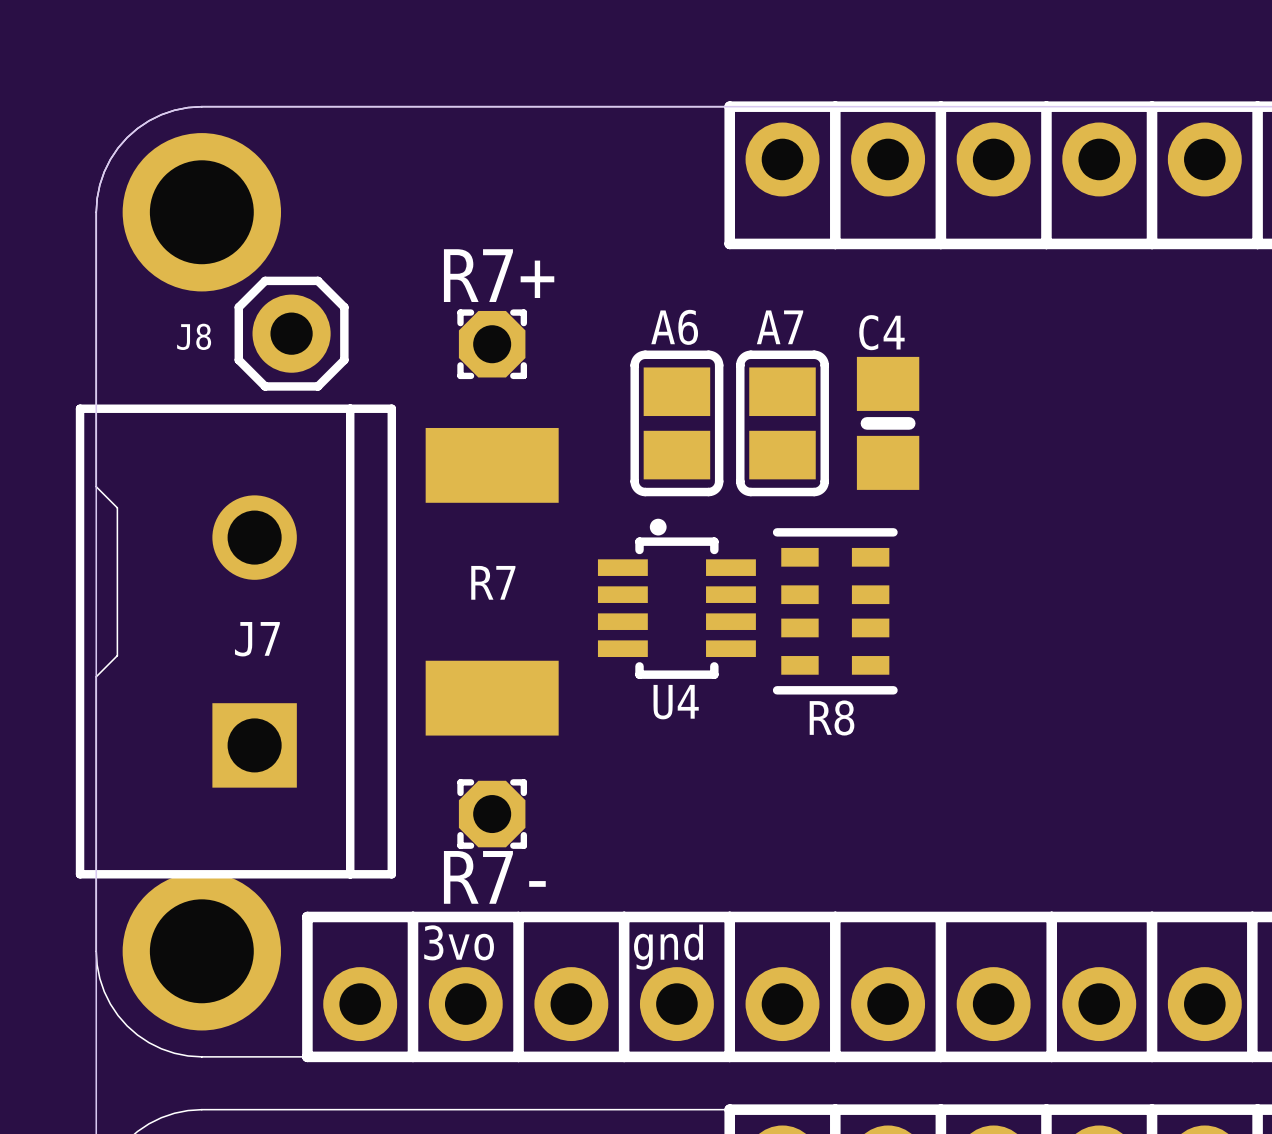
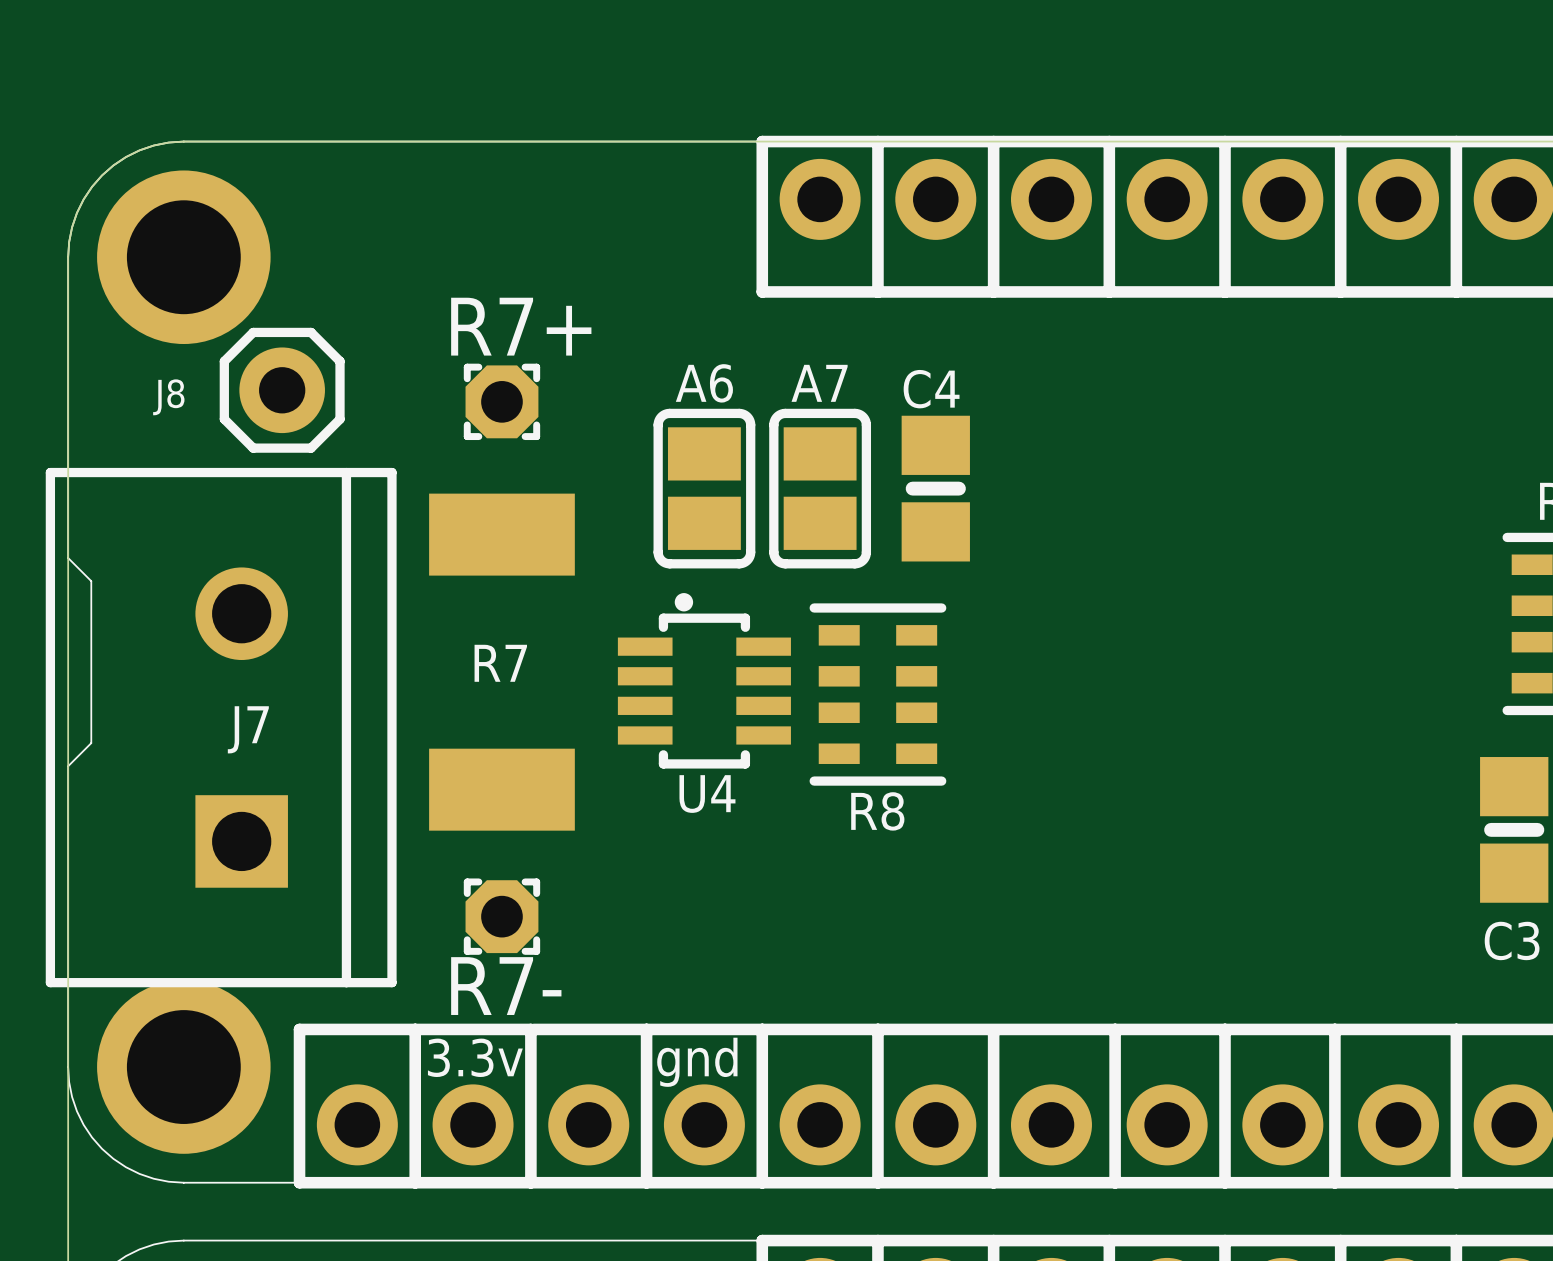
text: 3vo (459, 942) -> 3.3v (475, 1057)

